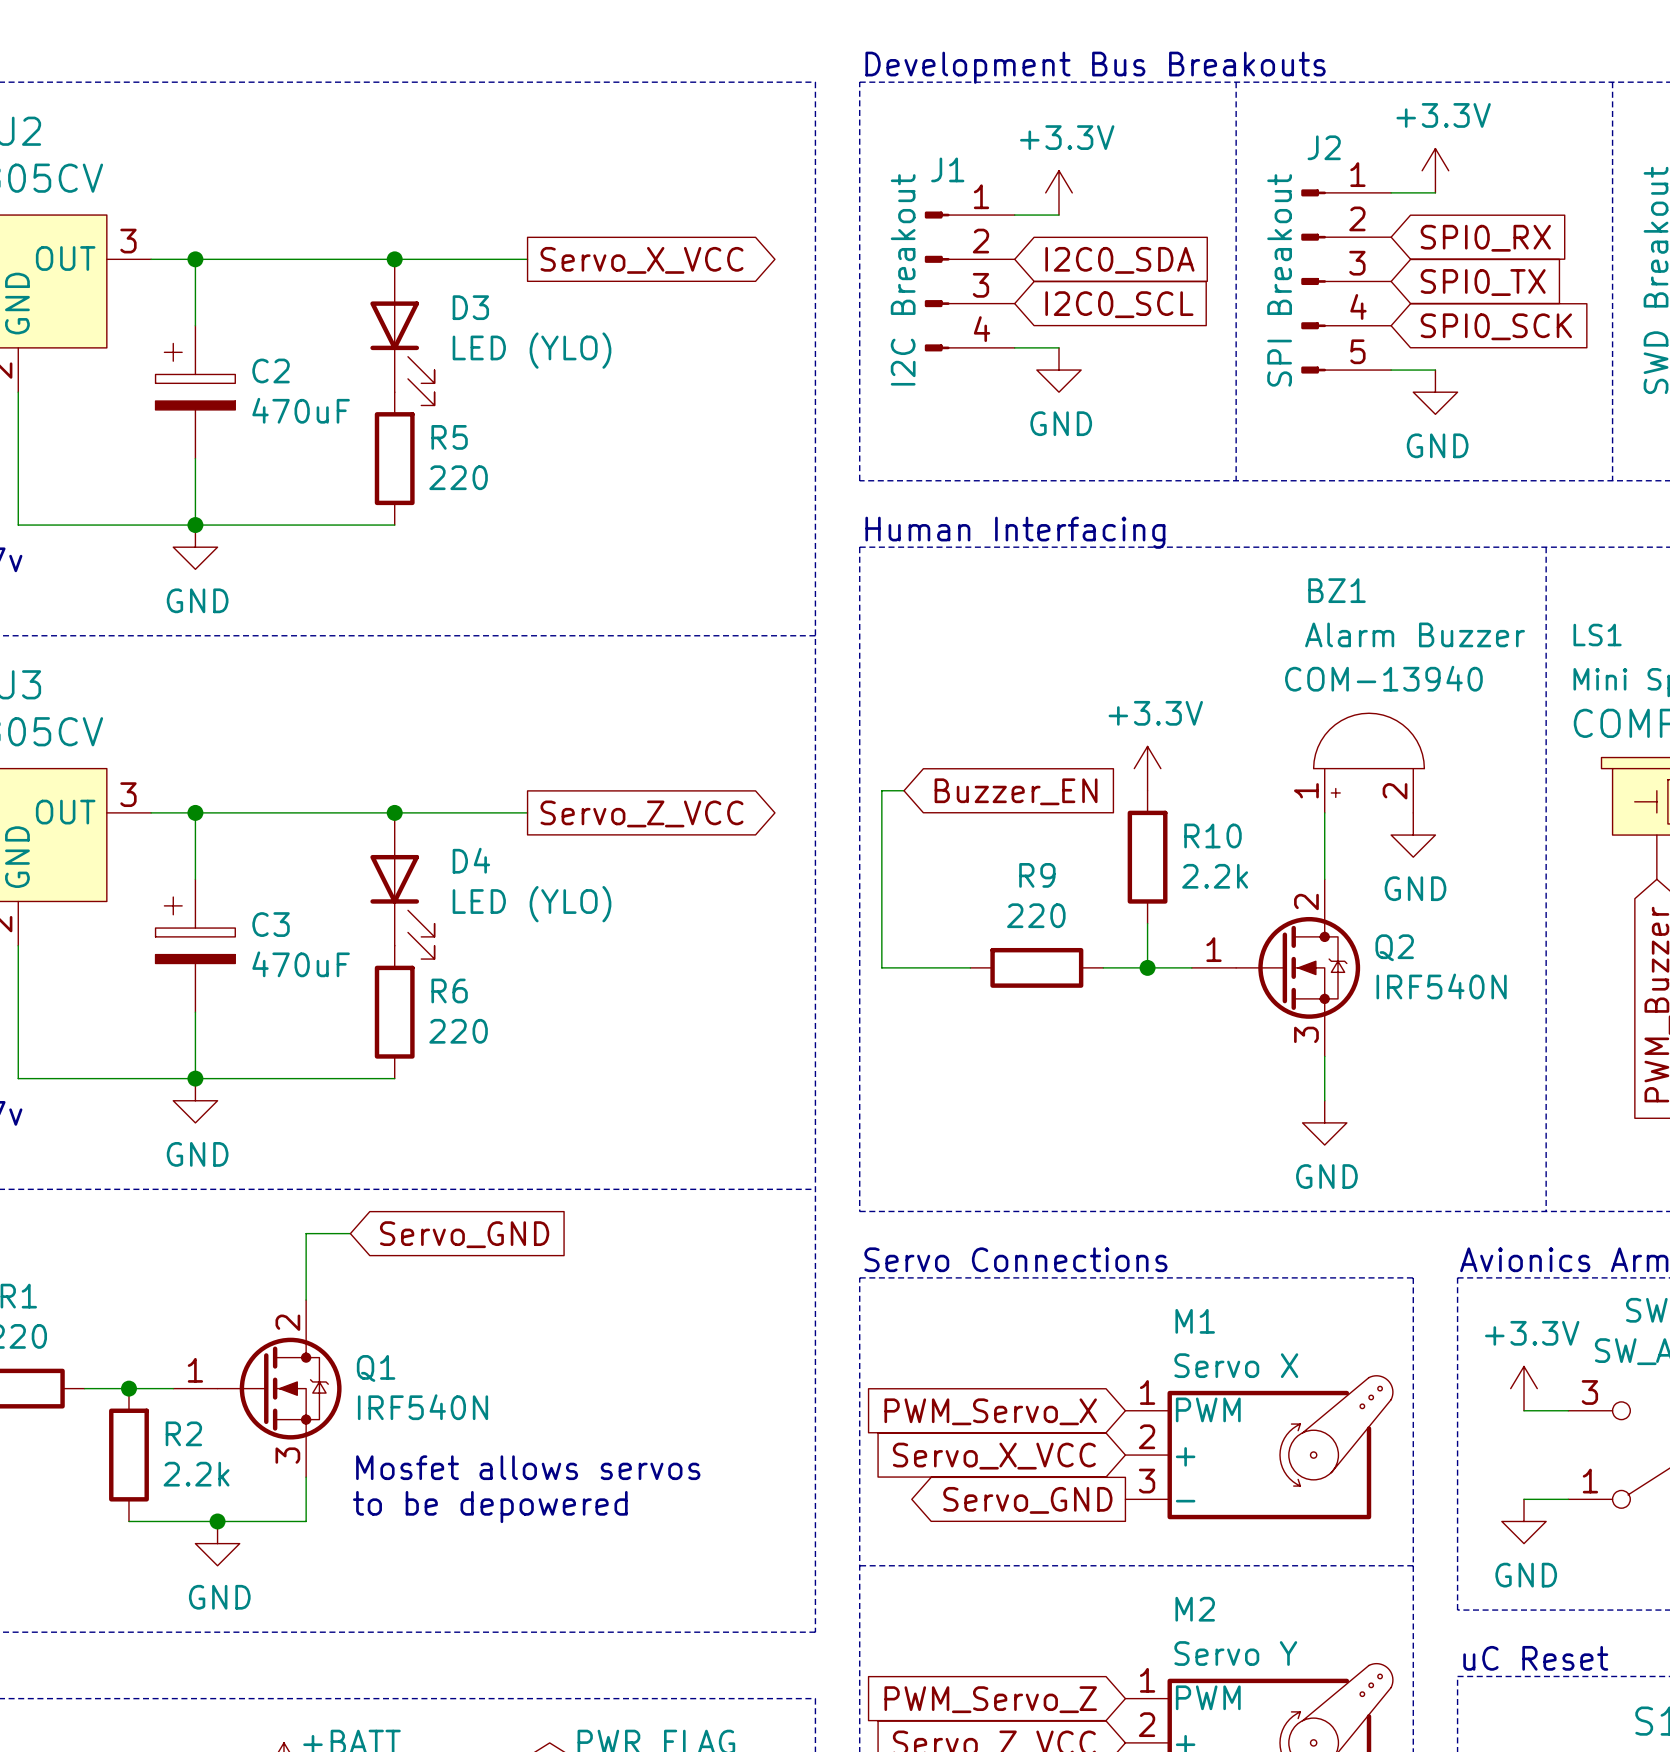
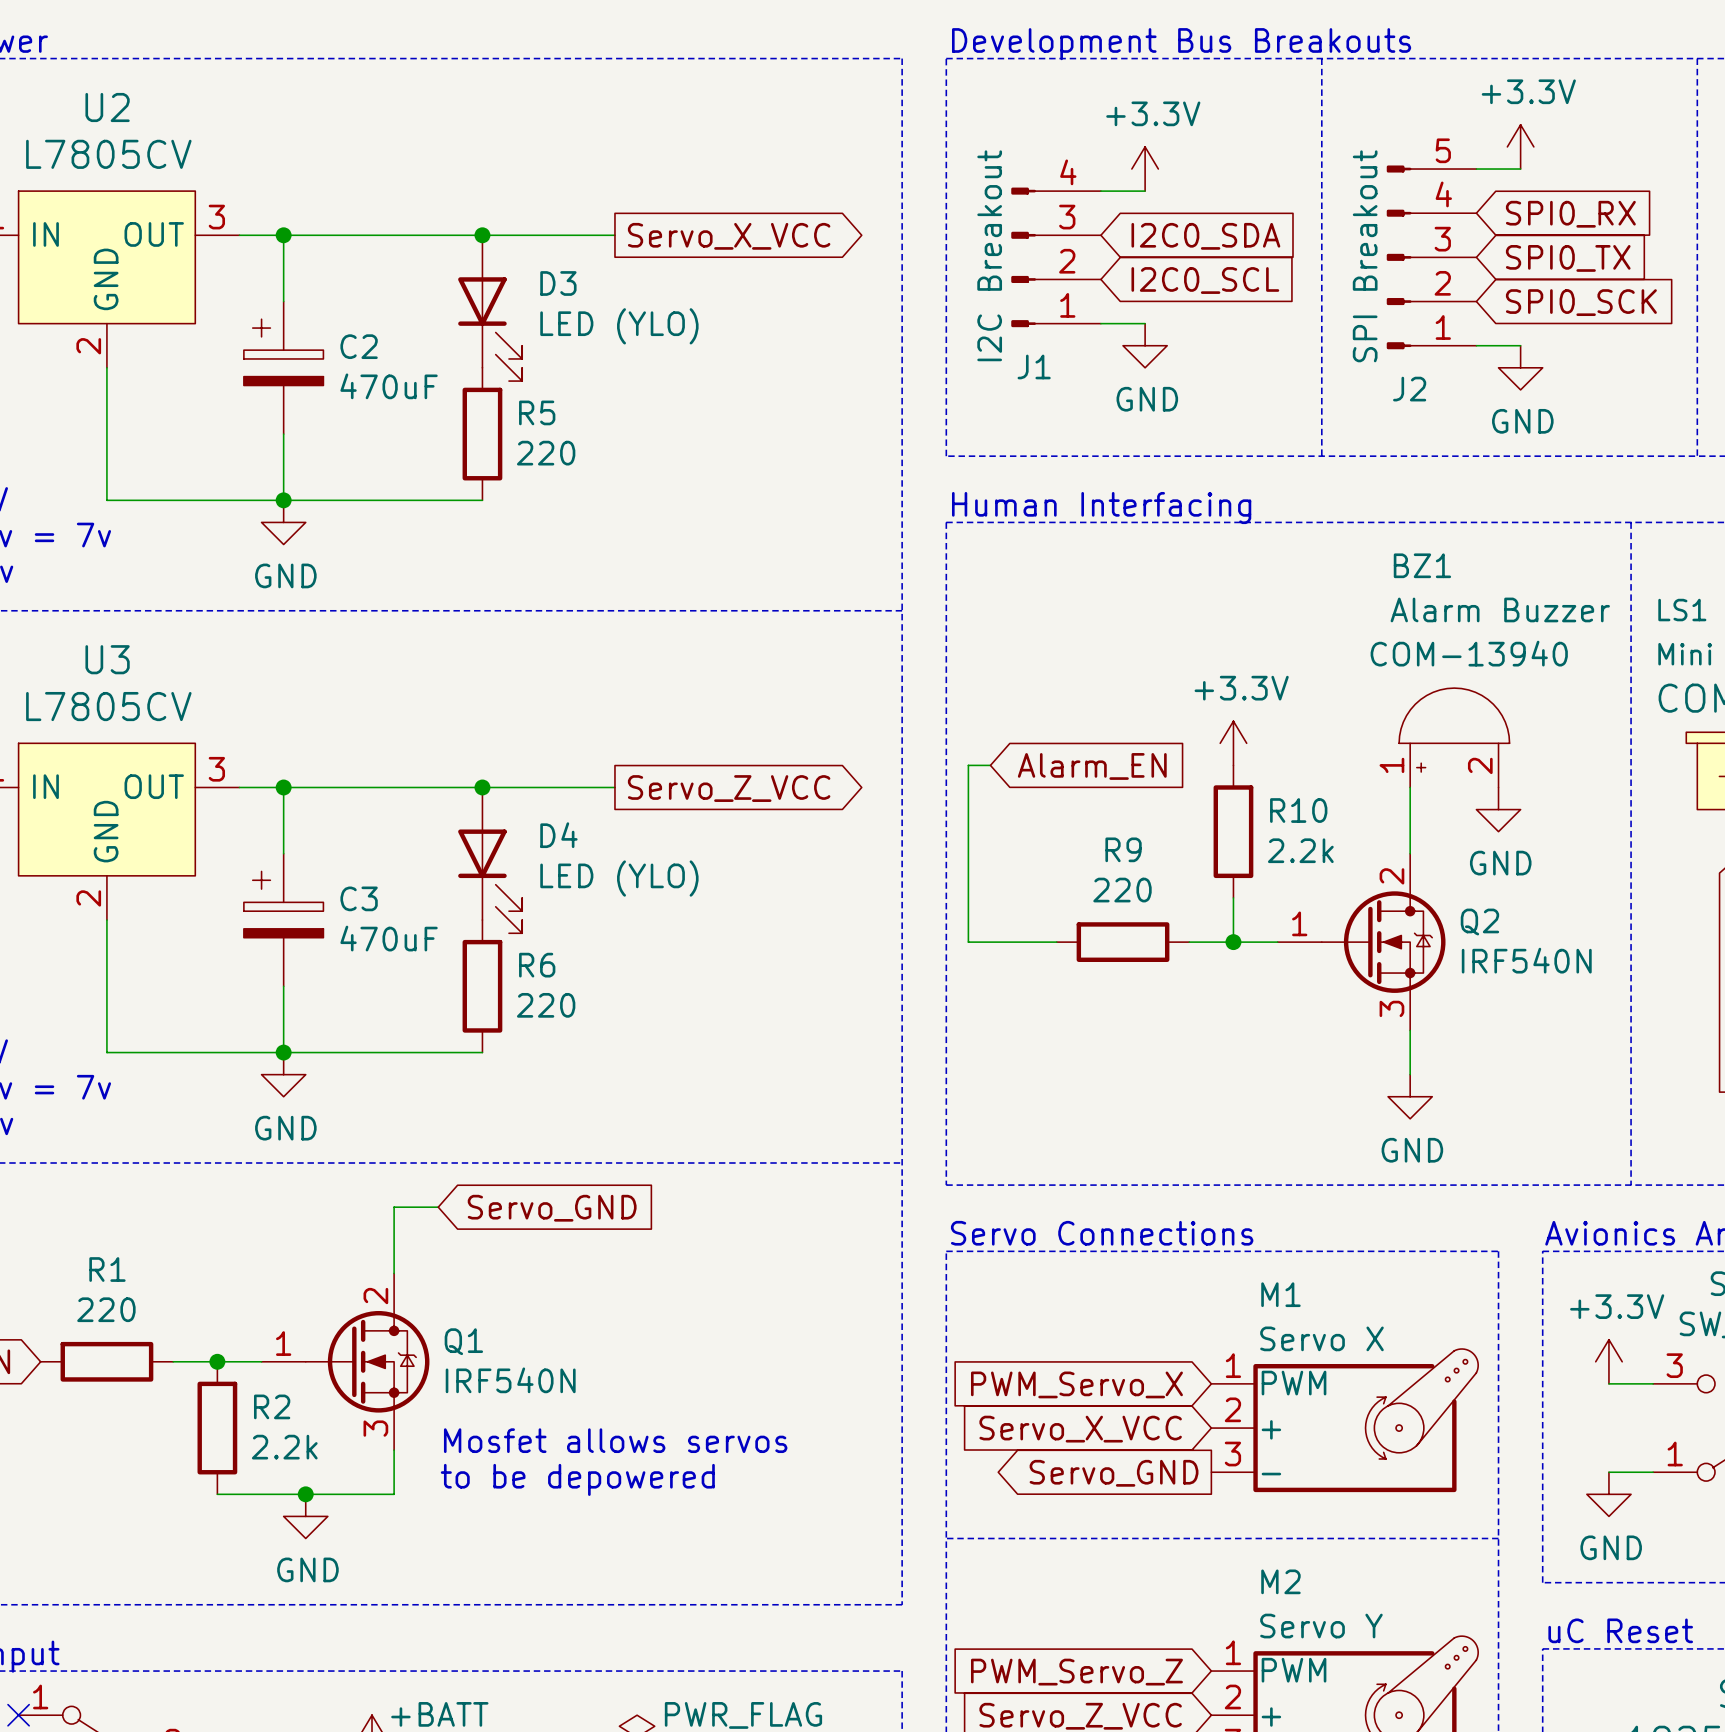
J1 flip: as is (937, 281) -> up-down (1023, 257)
J2 flip: as is (1313, 281) -> up-down (1399, 257)
global label: Buzzer_EN (1016, 791) -> Alarm_EN (1092, 766)

